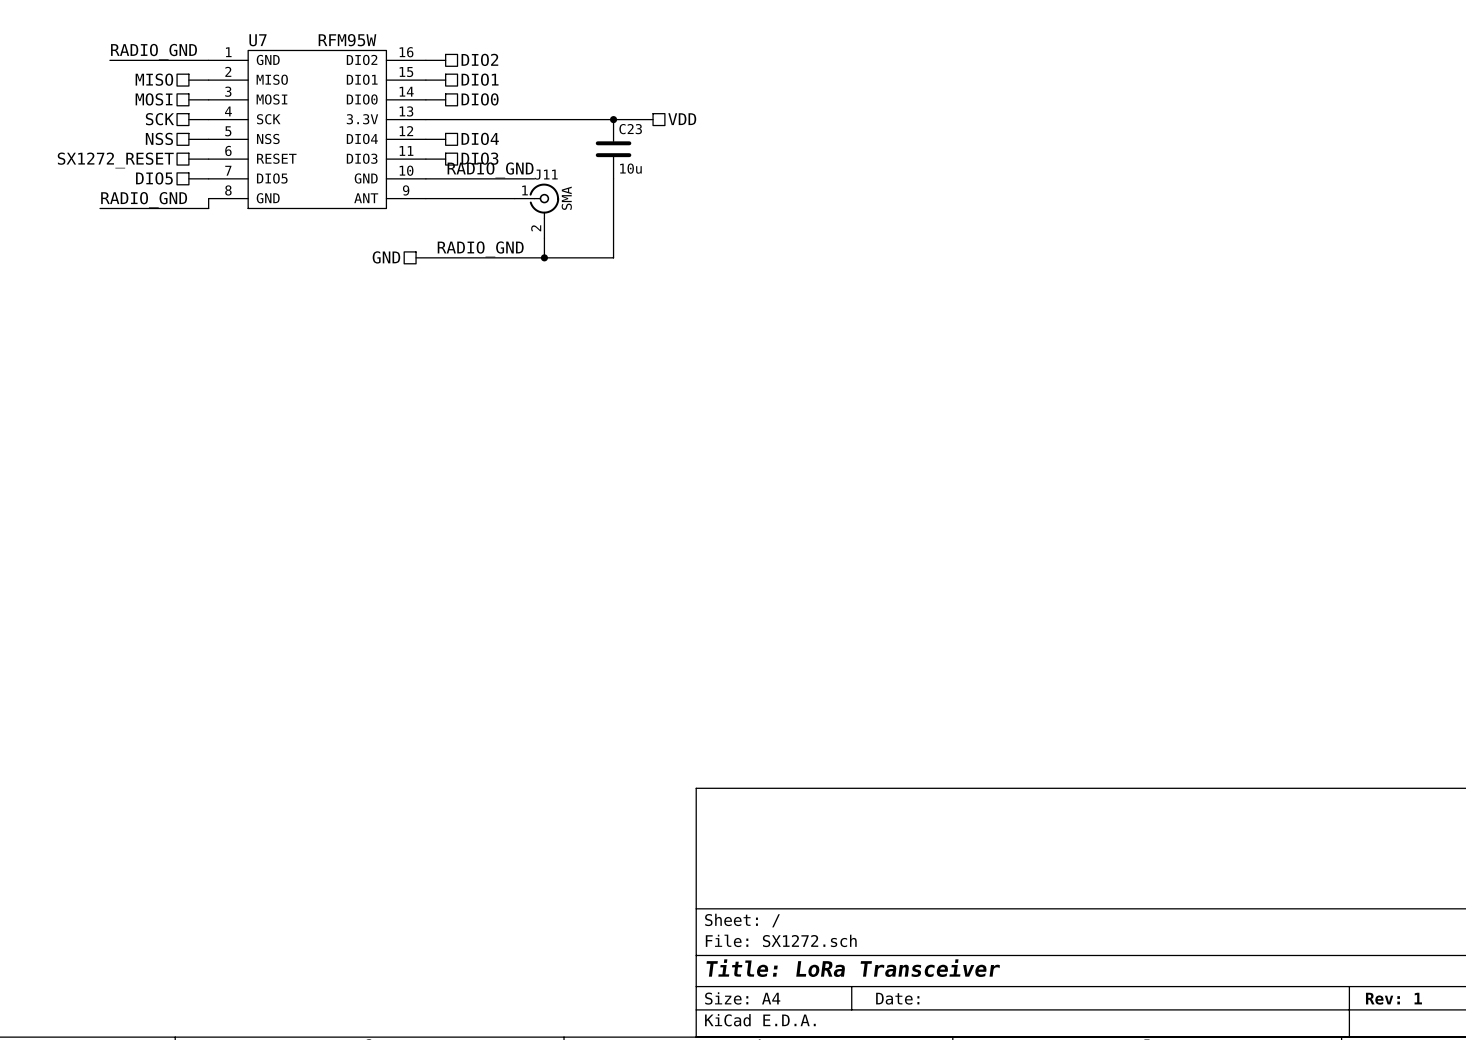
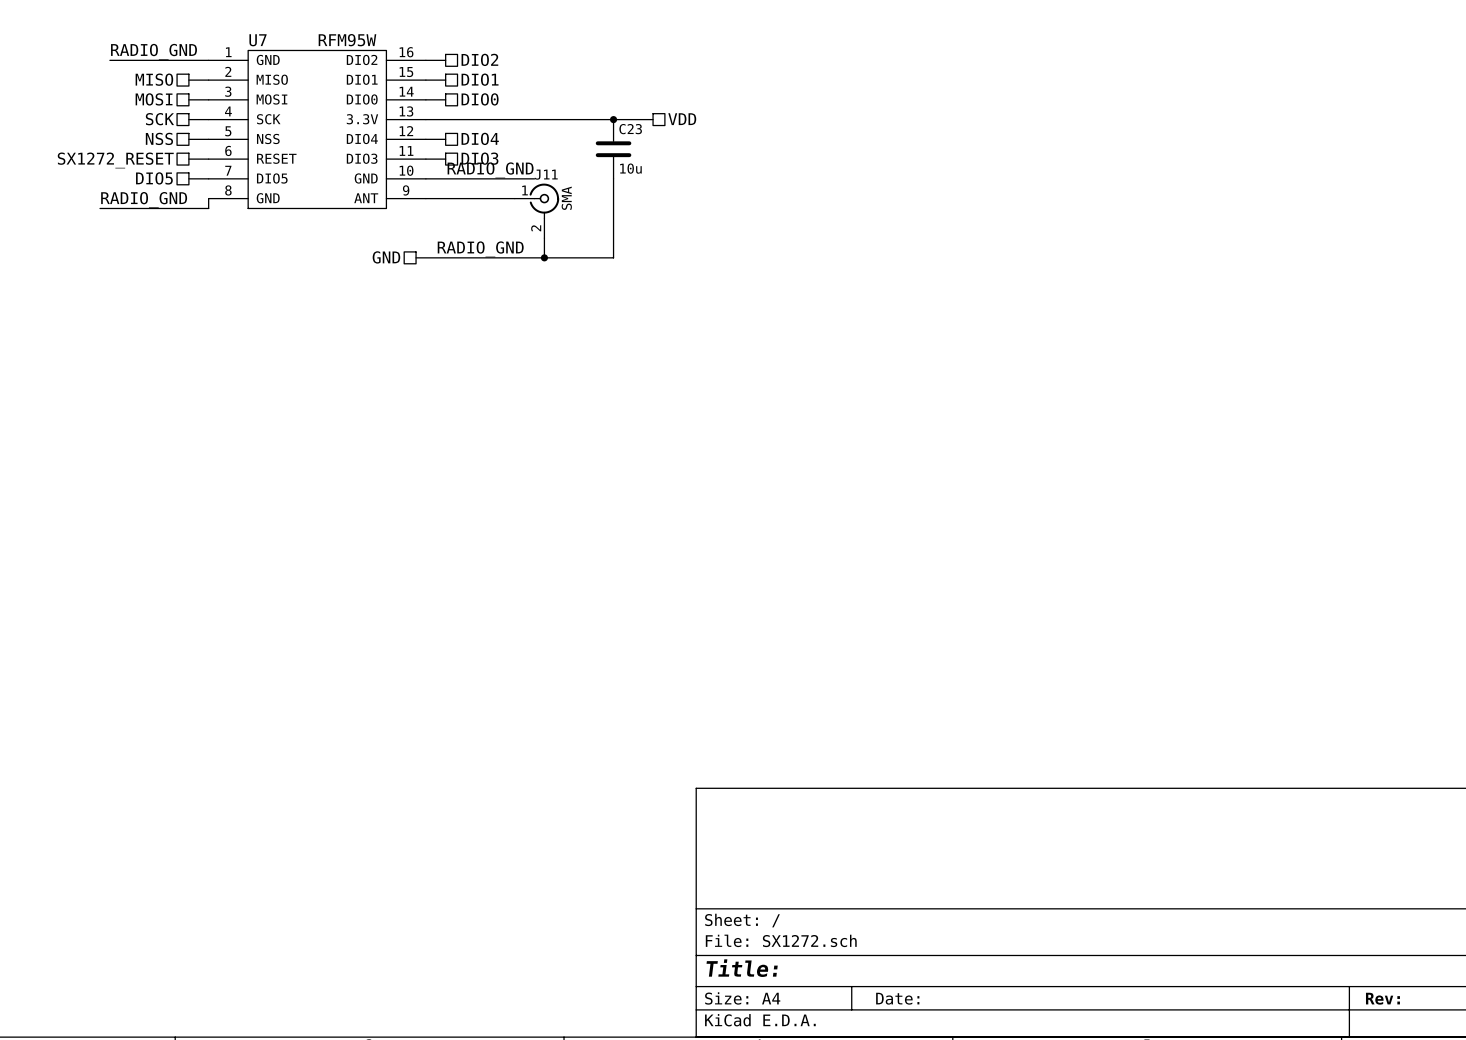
title block: Title: LoRa Transceiver (853, 968) -> Title: (742, 968)
title block: Rev: 1 (1393, 998) -> Rev: (1382, 998)

